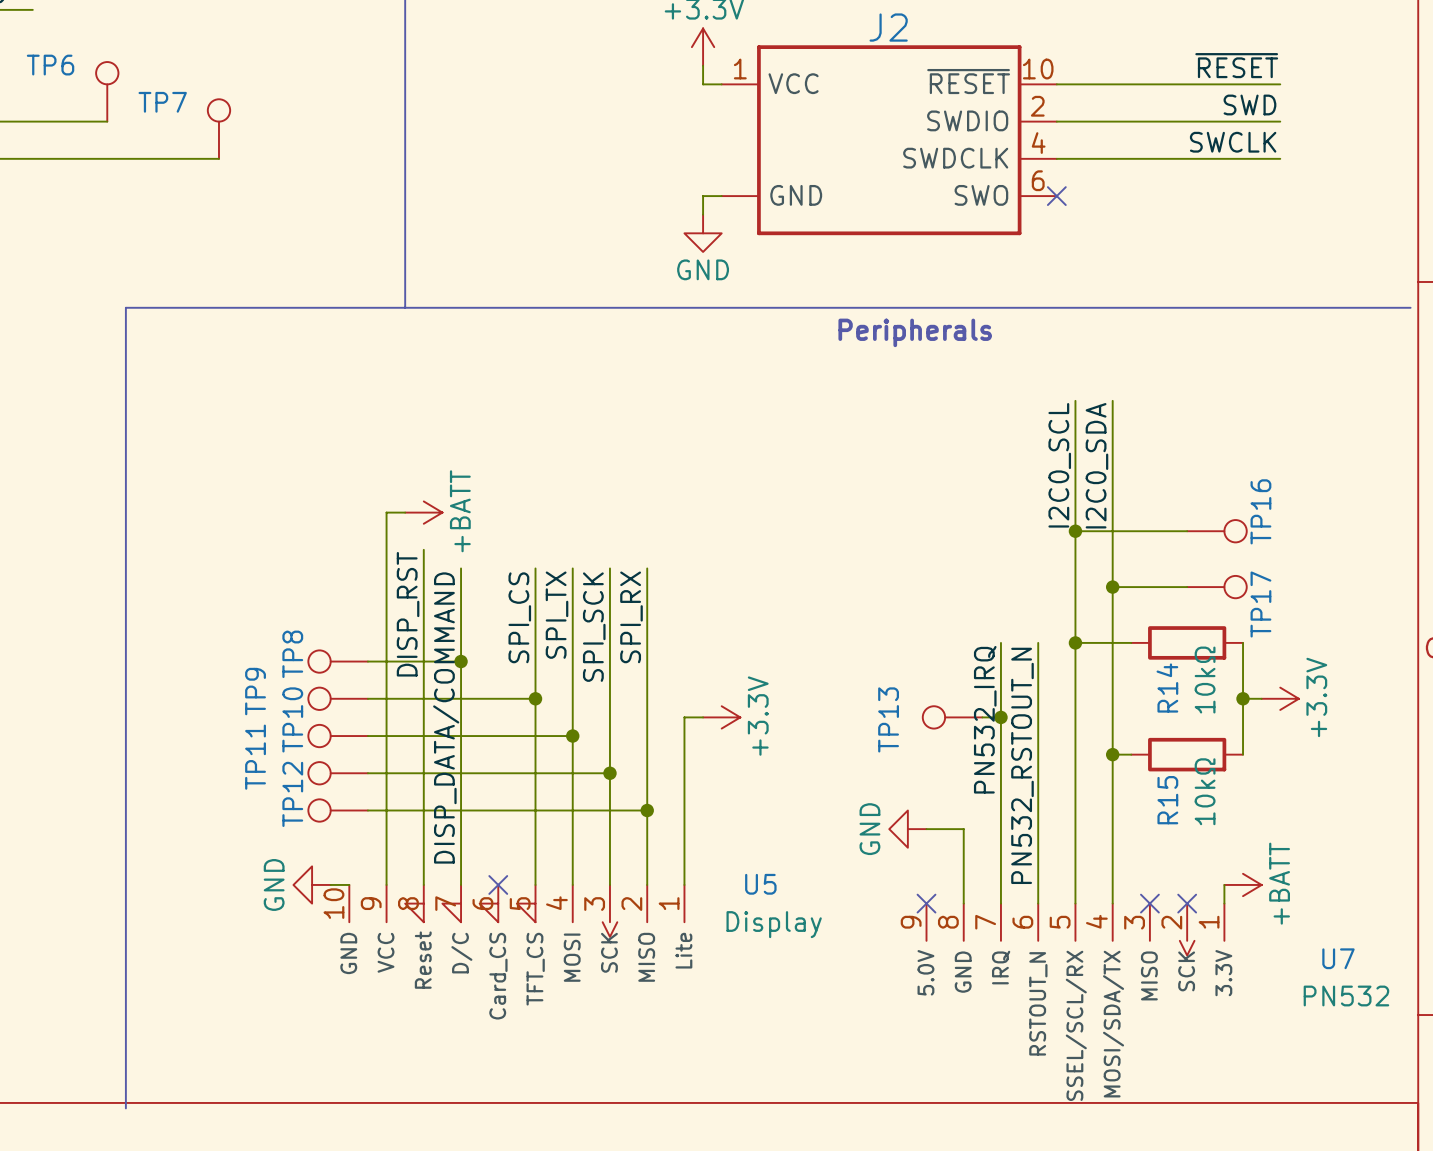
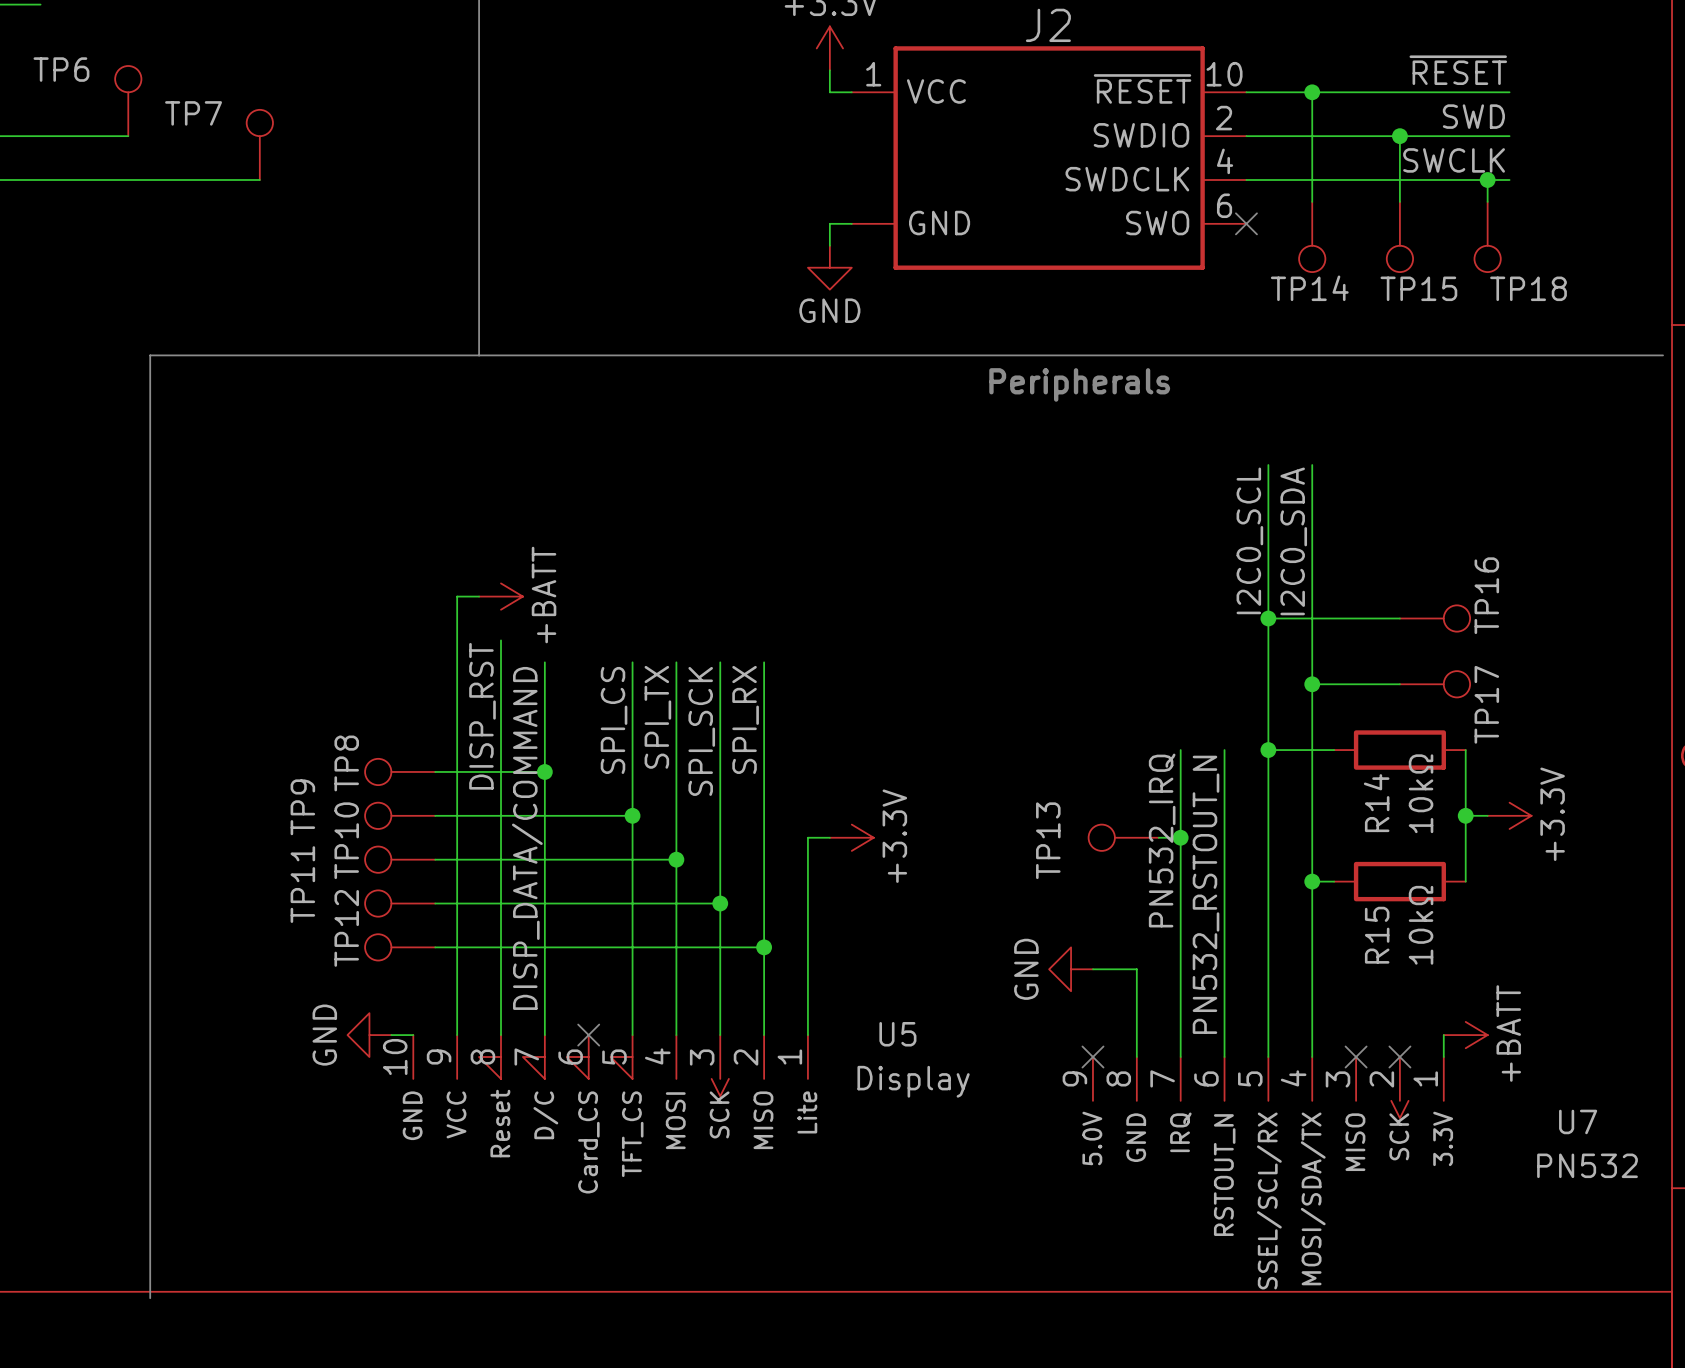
wire: none -> (1312, 92) (1312, 201)
junction: none -> (1312, 92)
wire: none -> (1399, 136) (1399, 201)
junction: none -> (1399, 136)
wire: none -> (1487, 180) (1487, 201)
junction: none -> (1487, 180)
TP14: none -> (1312, 237)
TP15: none -> (1399, 237)
TP18: none -> (1487, 237)

